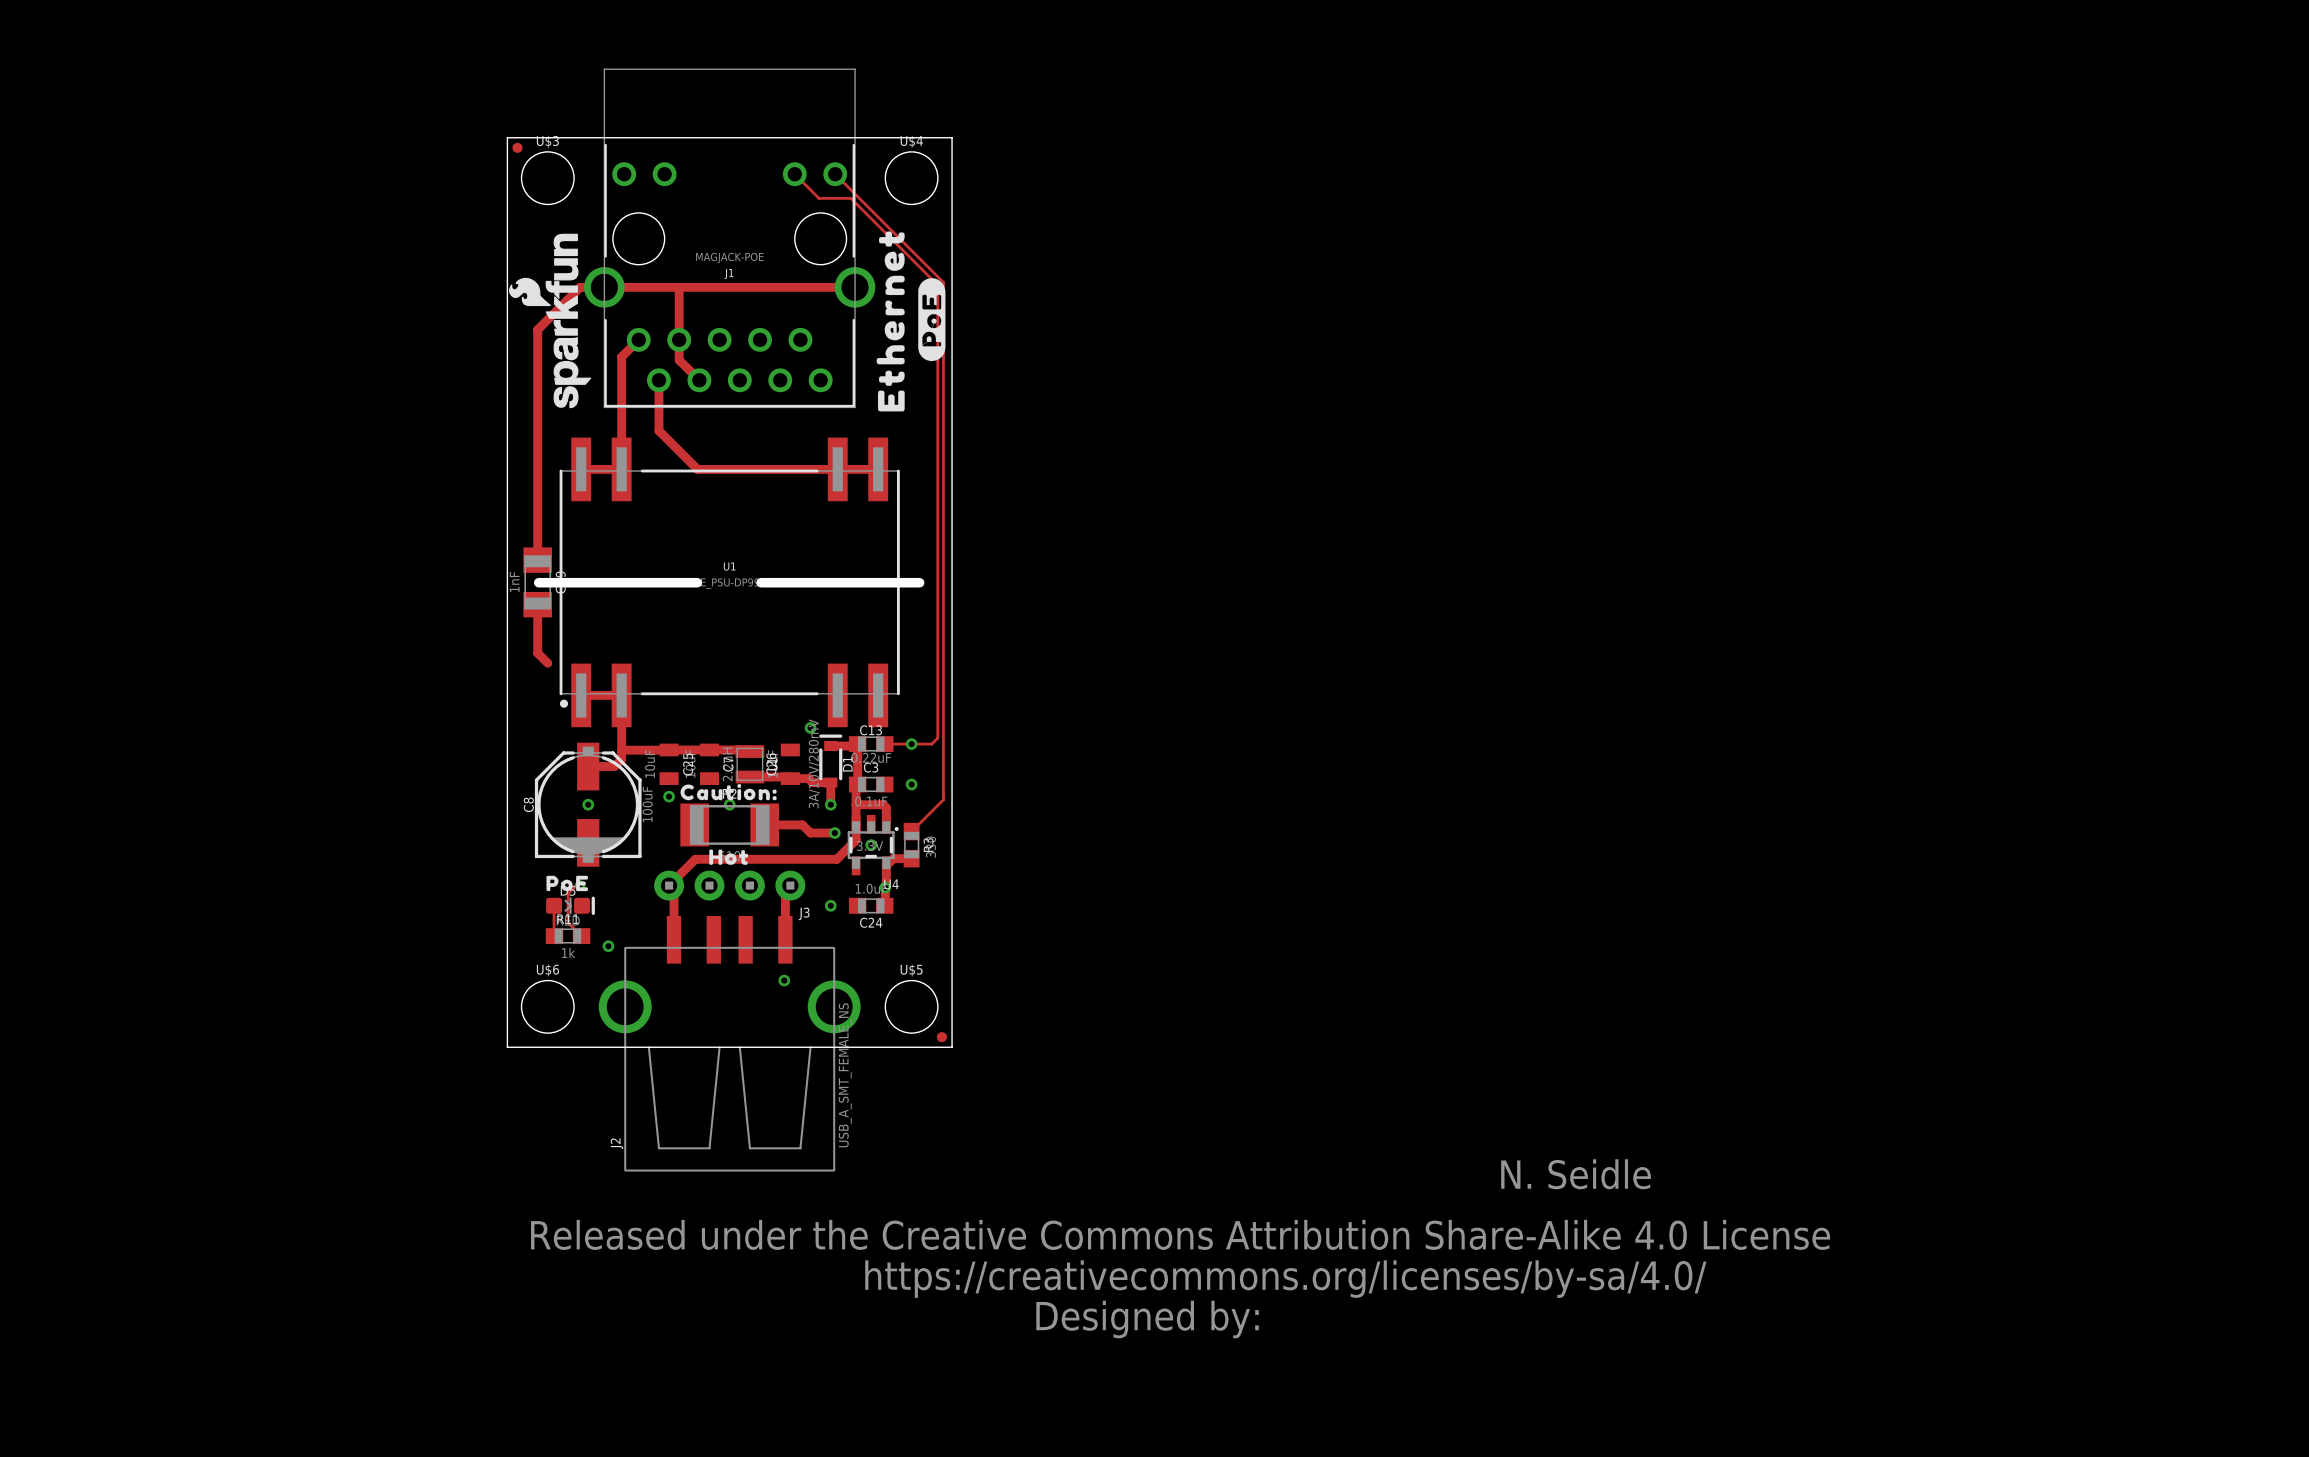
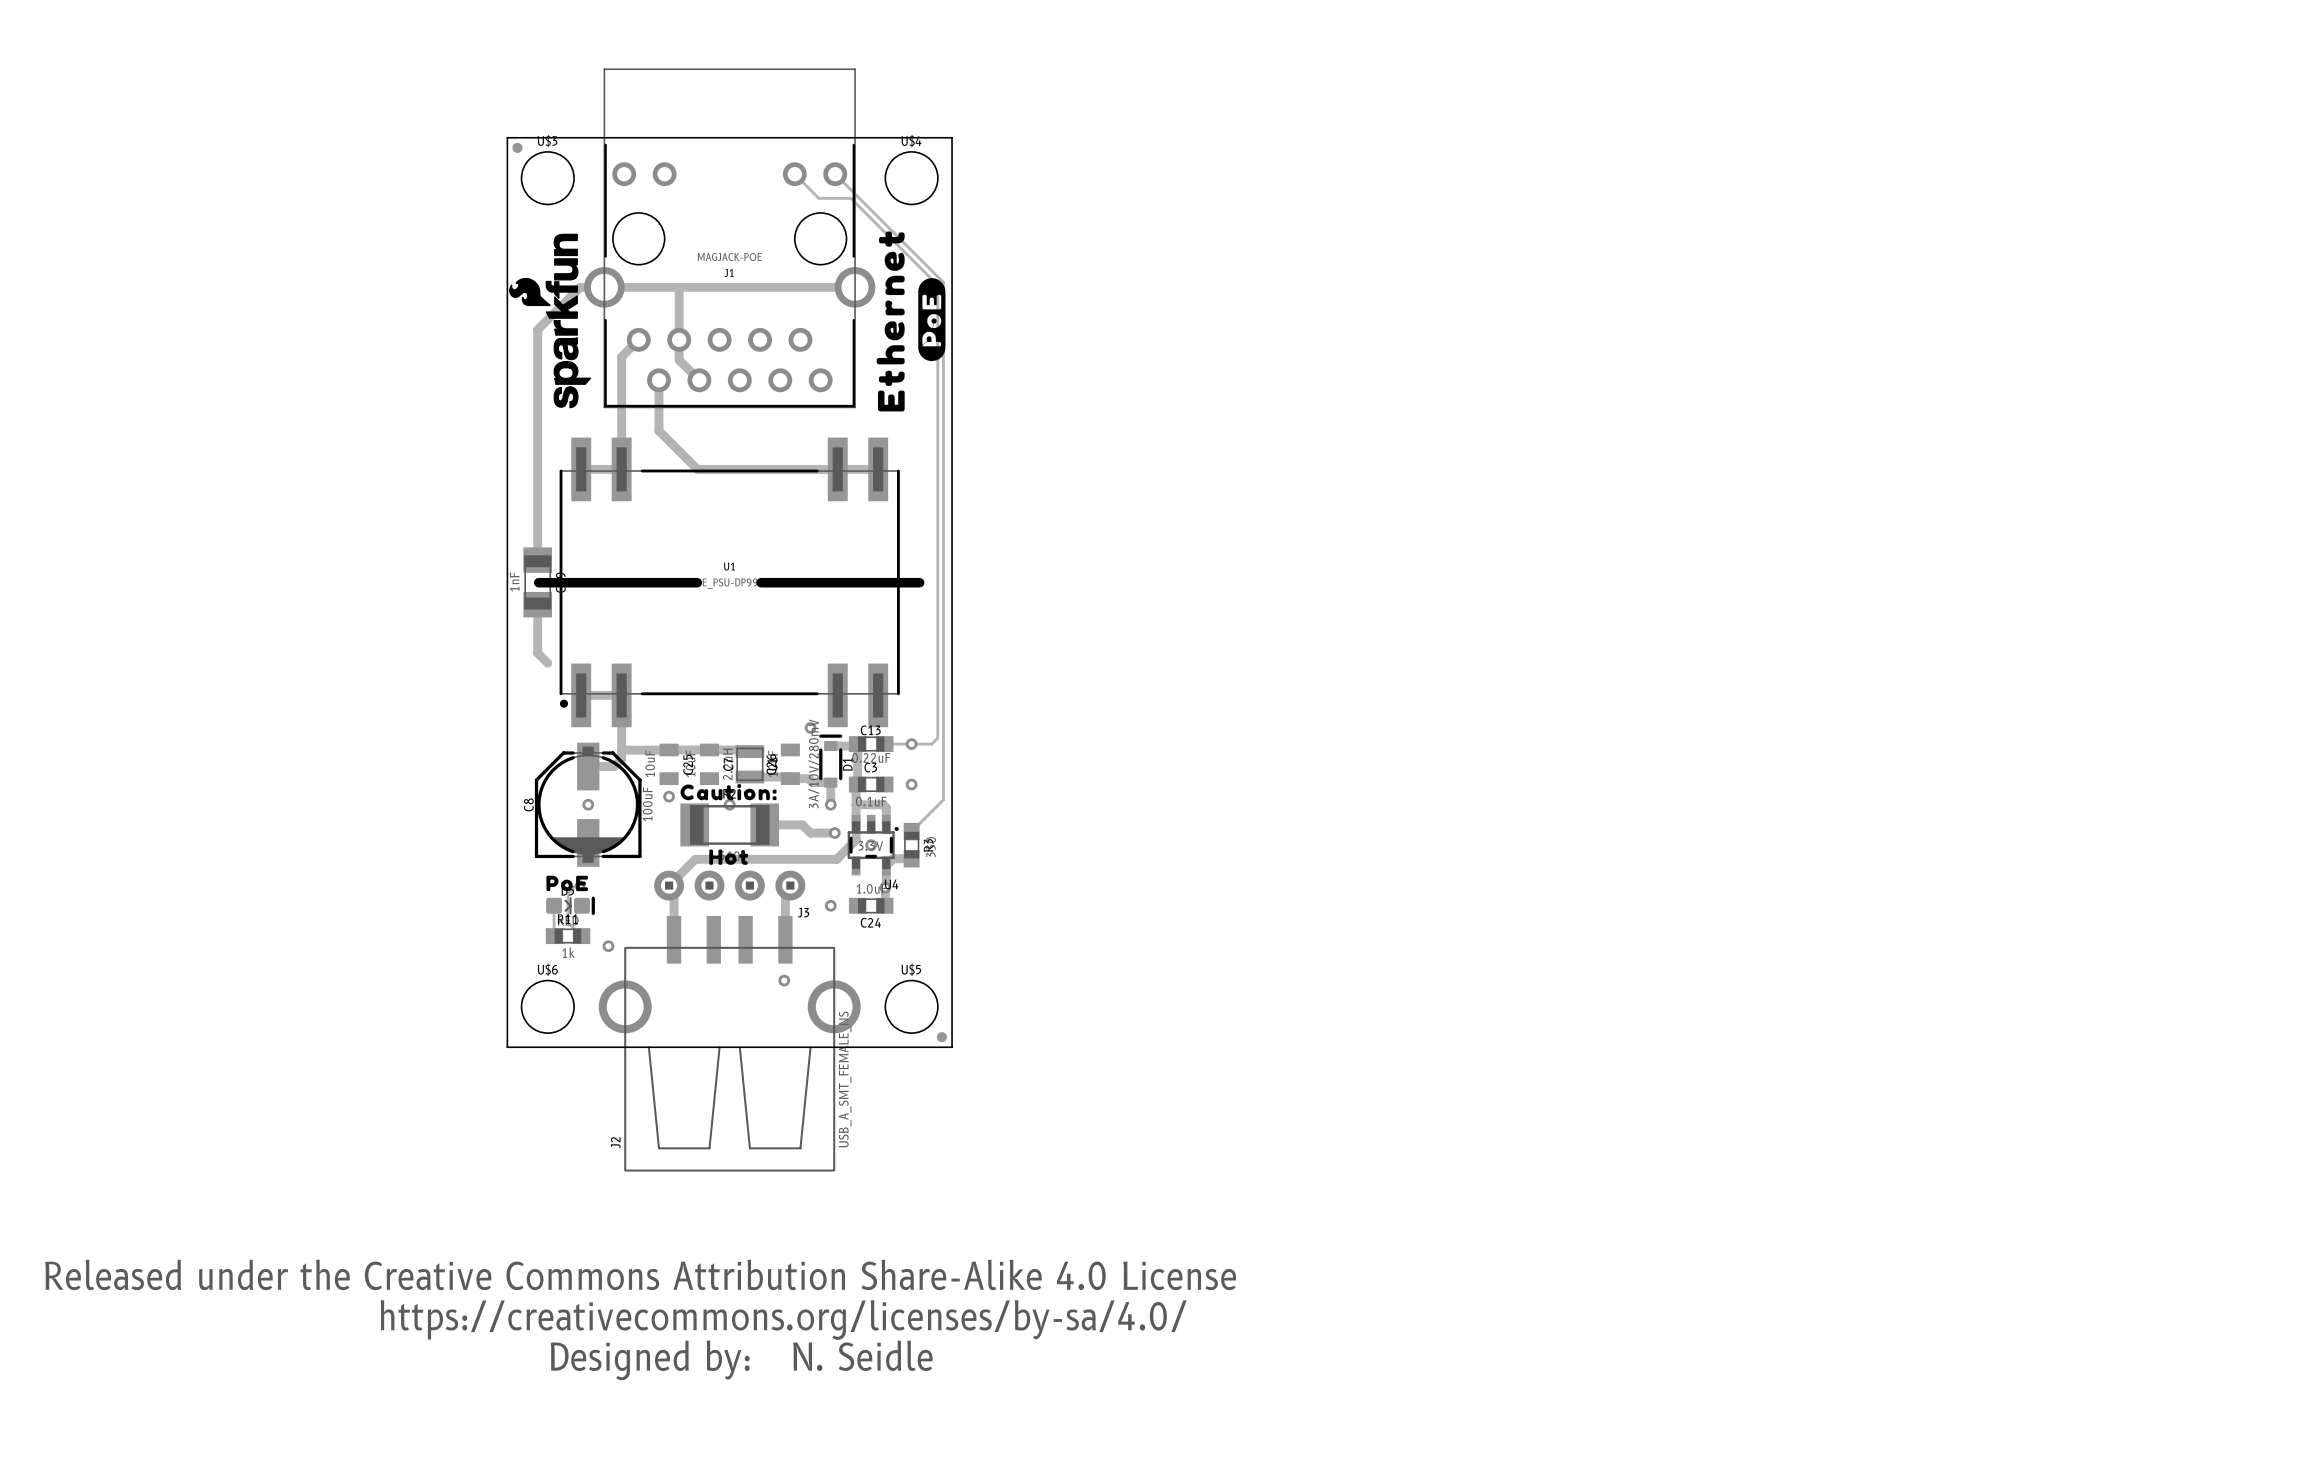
text: N. Seidle (1576, 1174) -> none
drawing: [531, 1219, 1831, 1339] -> none
drawing: none -> [45, 1259, 1237, 1381]
text: none -> N. Seidle (862, 1355)

